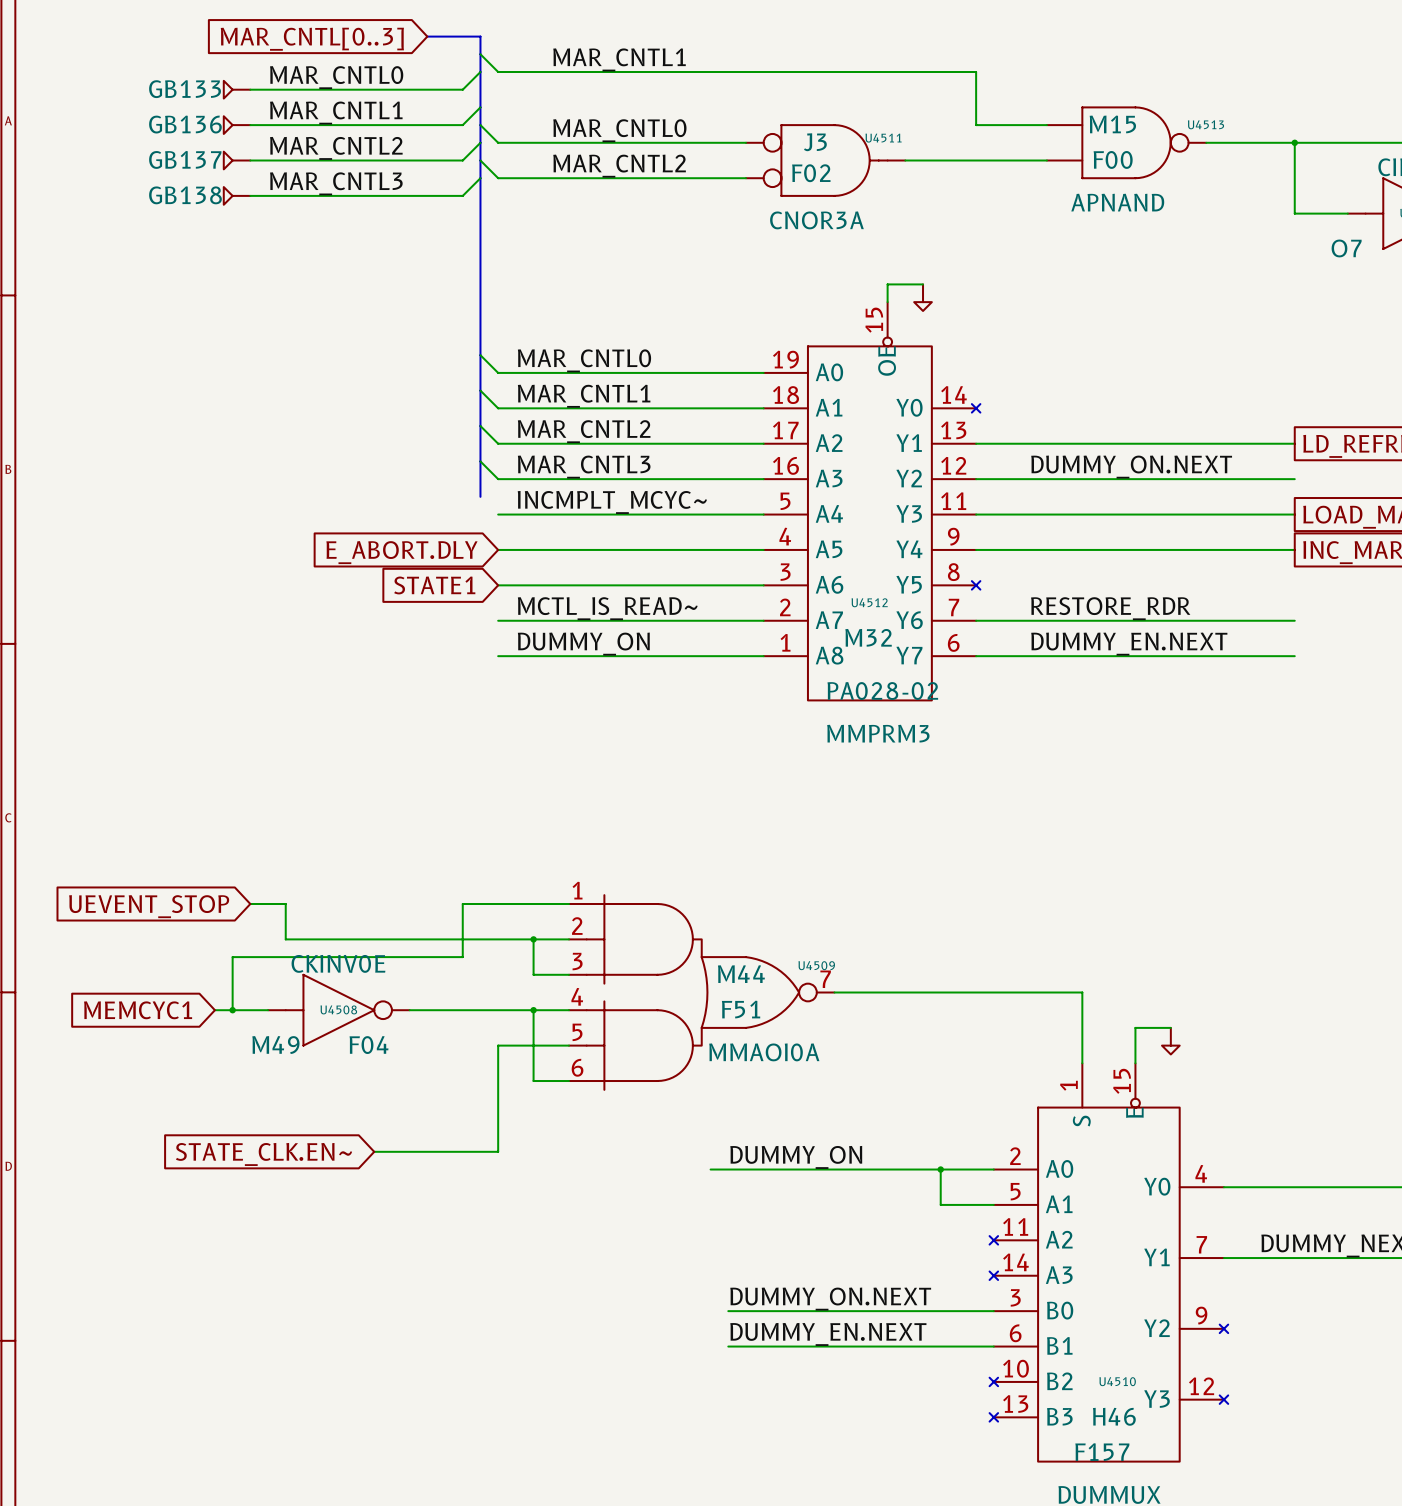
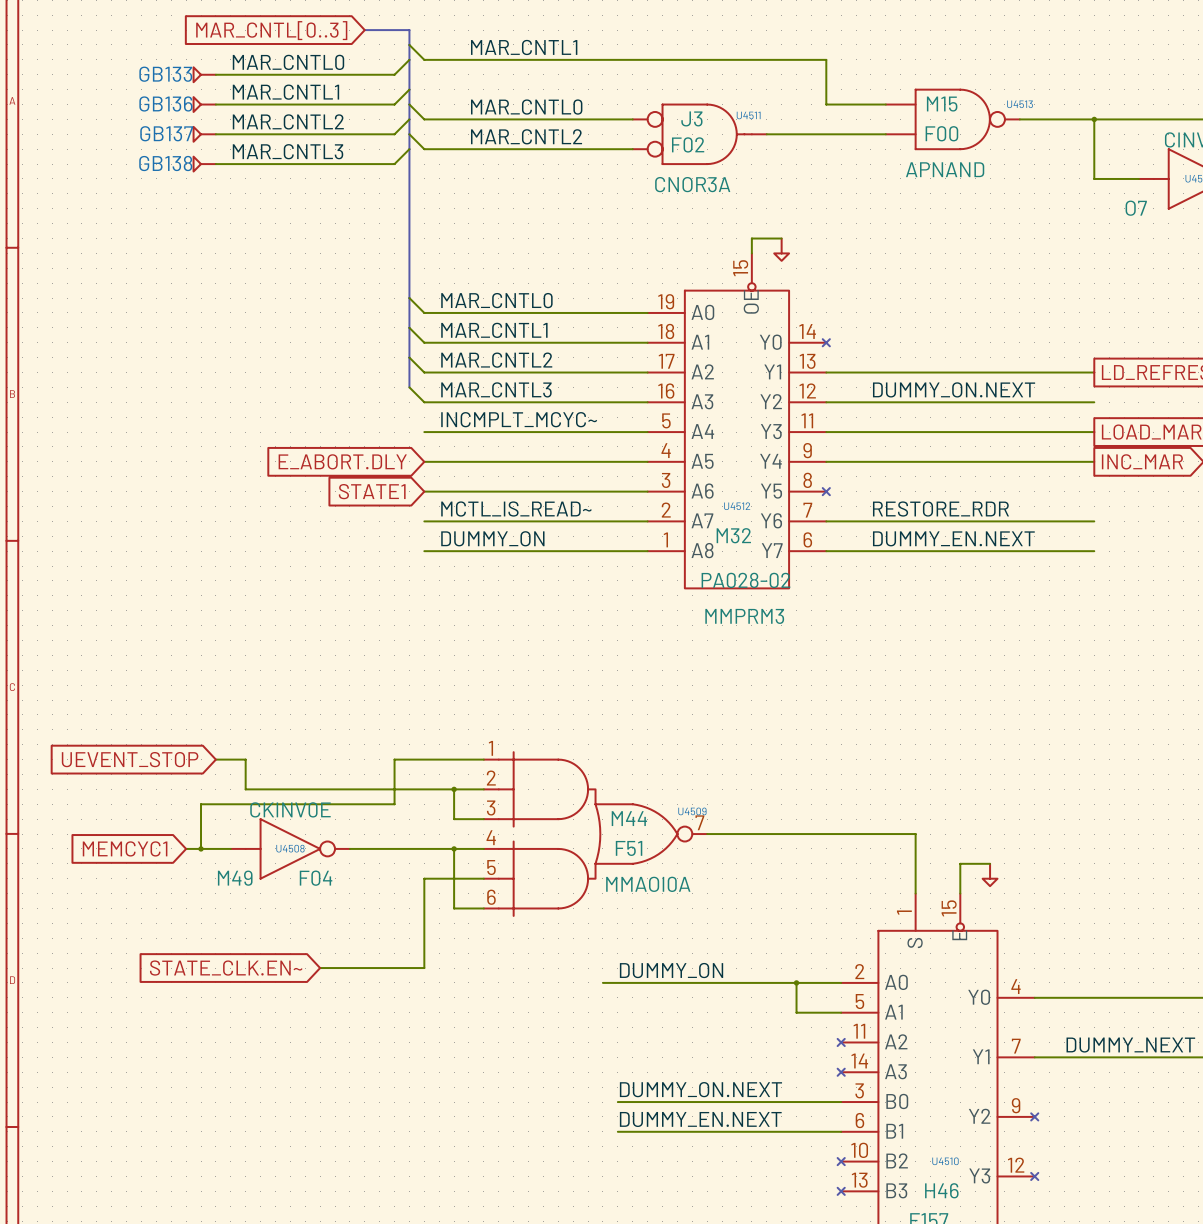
bus: (480, 461) (480, 496) -> none

